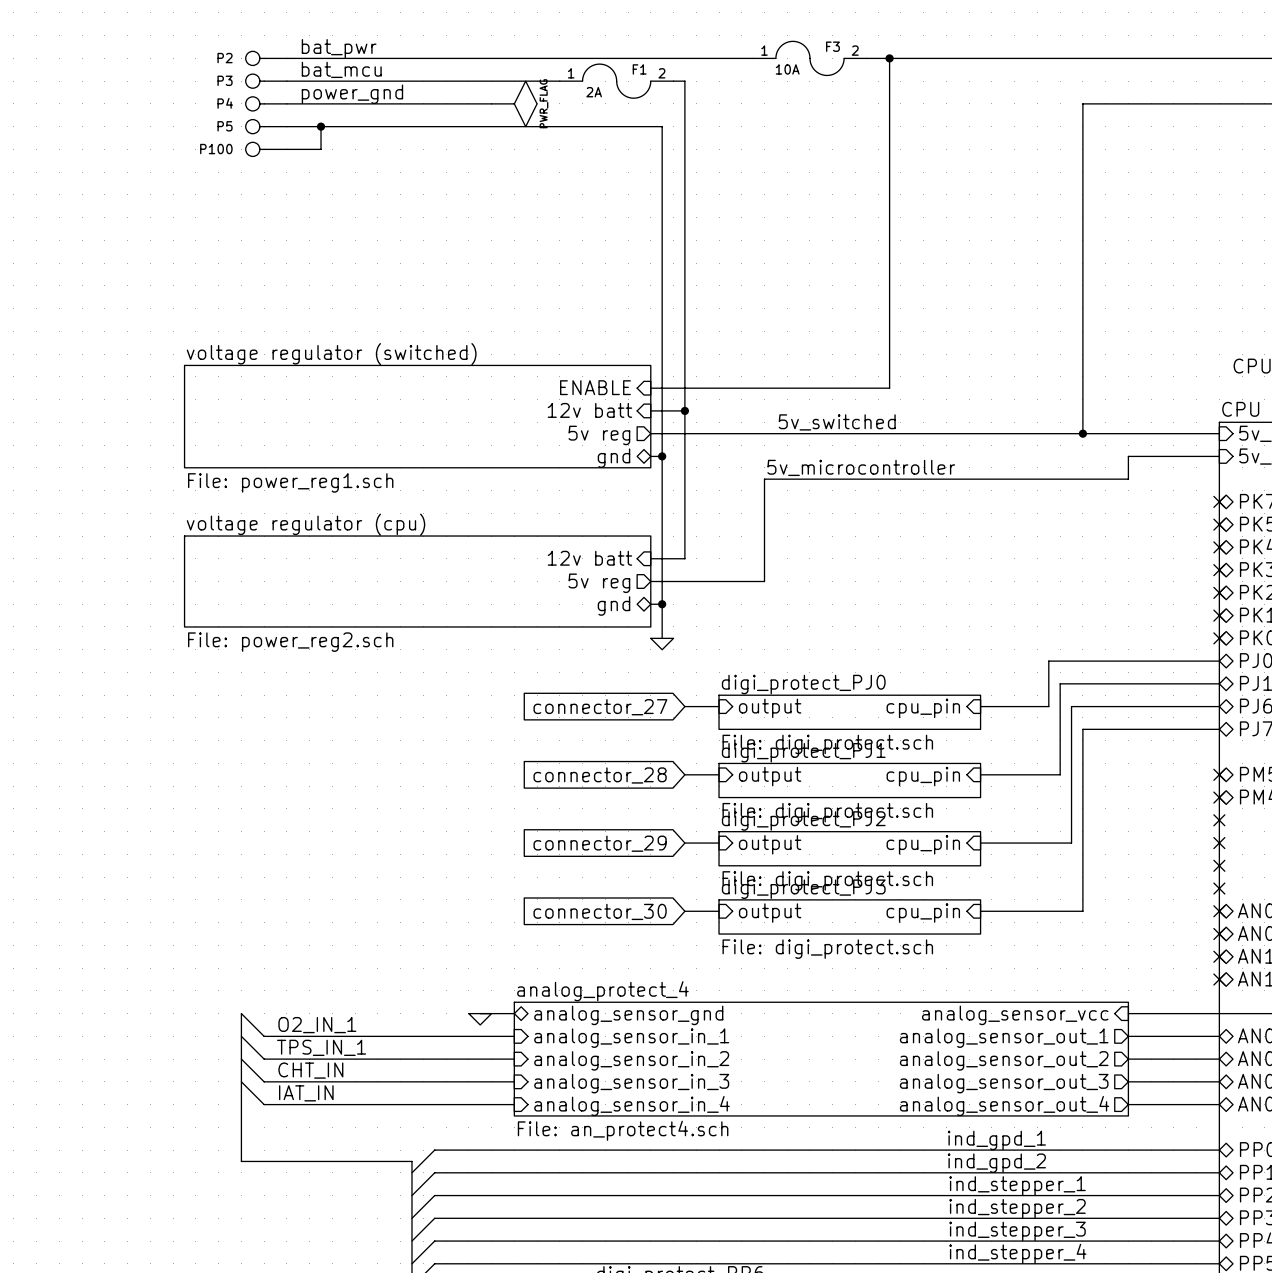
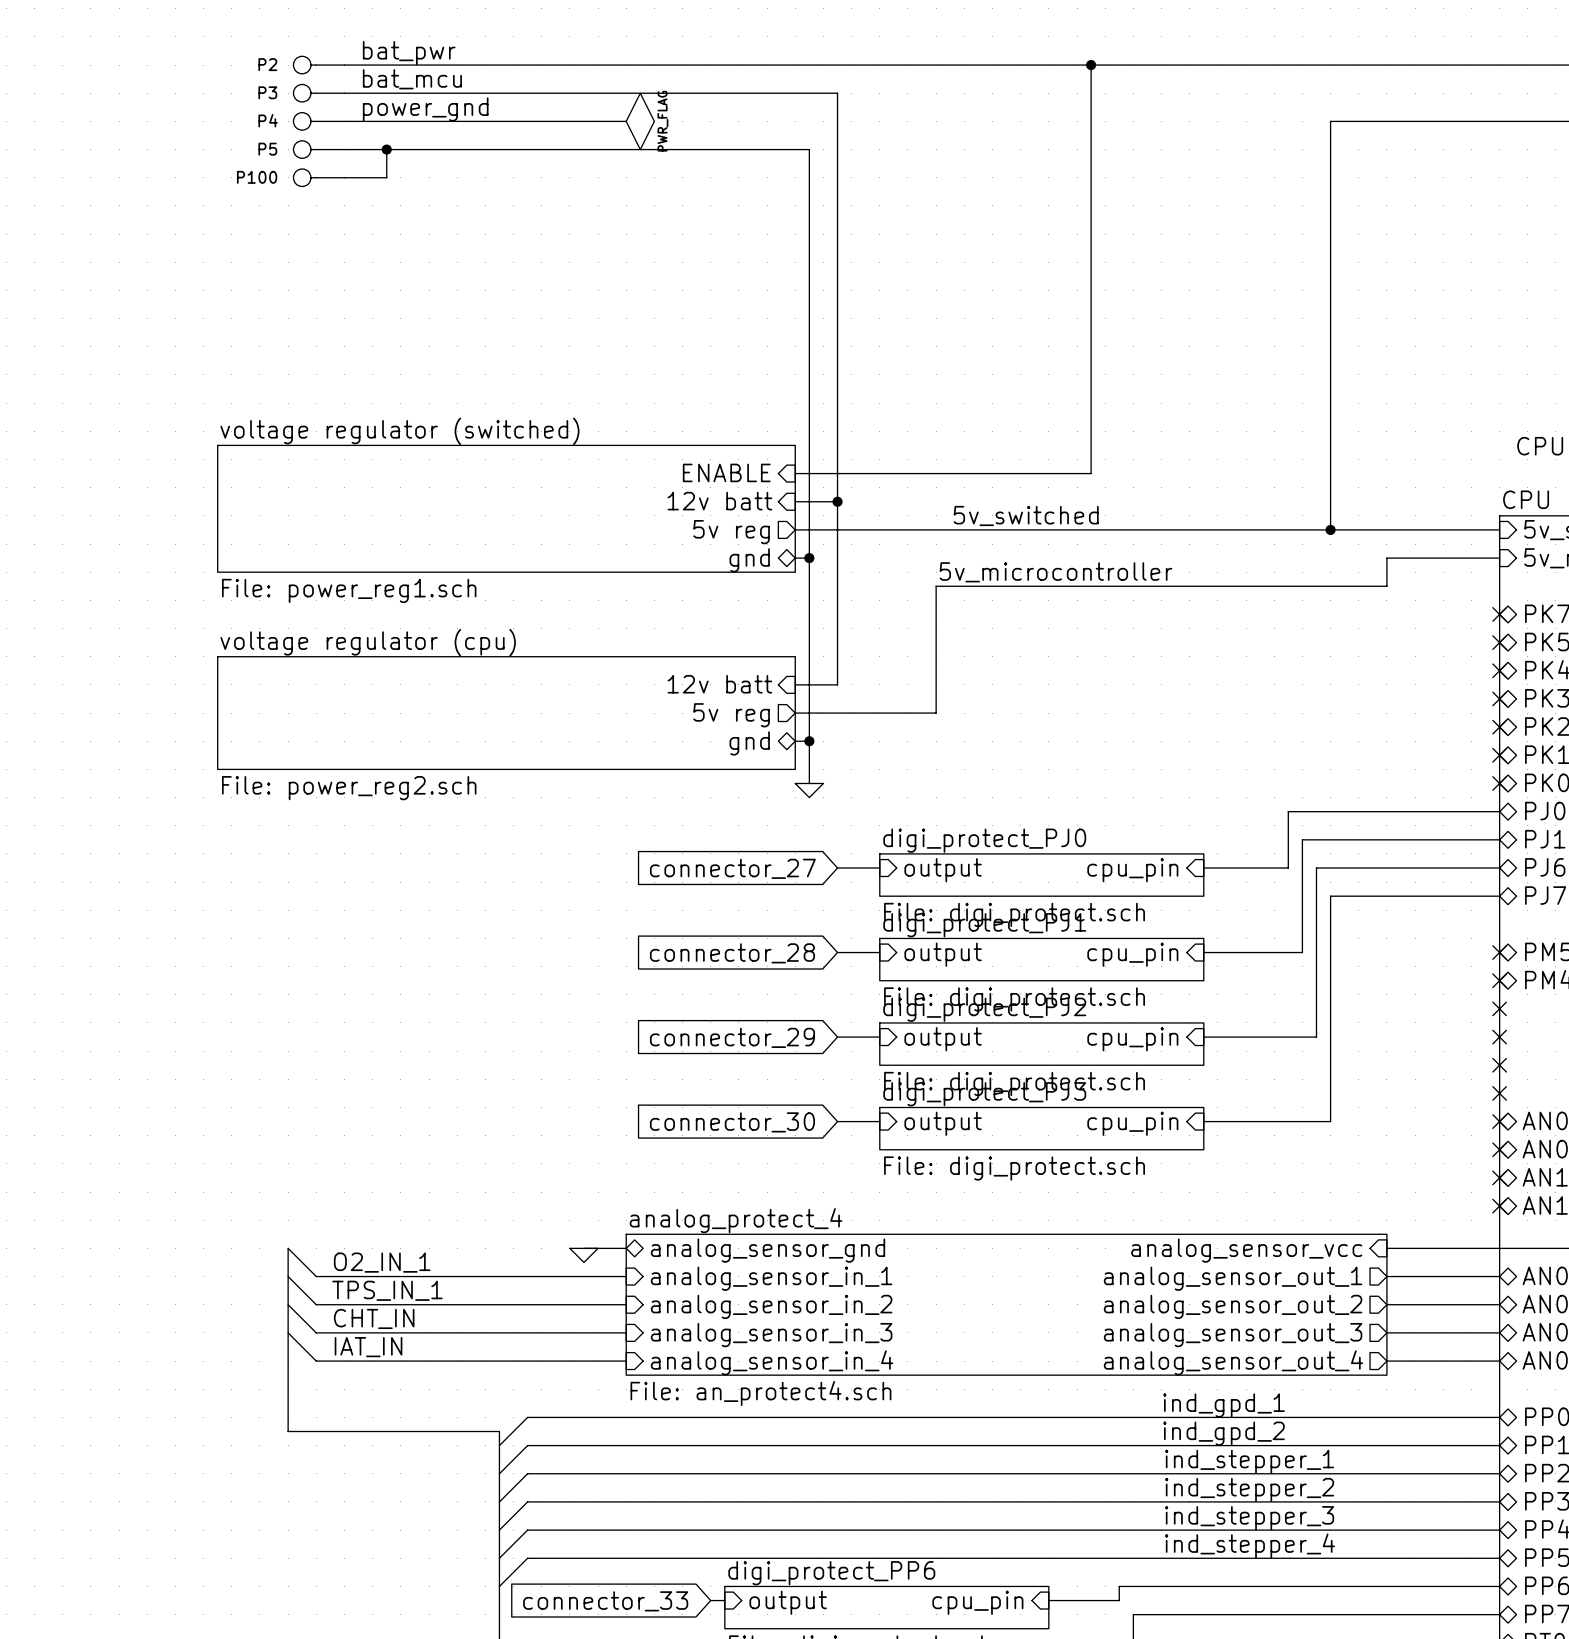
wire: none -> (922, 65) (1062, 65)
F3: 10A (809, 58) -> none
wire: none -> (682, 93) (823, 93)
F1: 2A (616, 81) -> none

